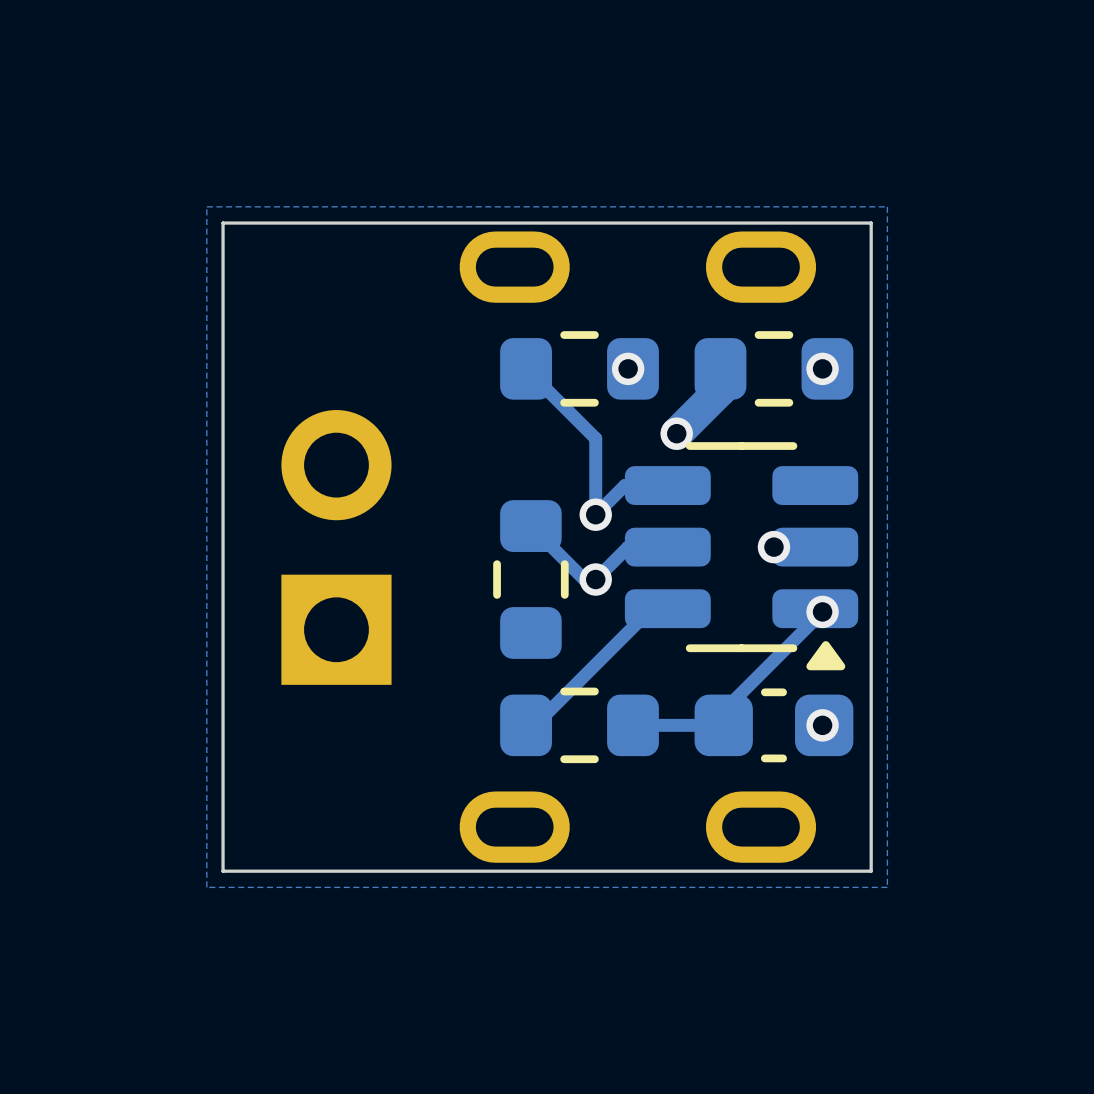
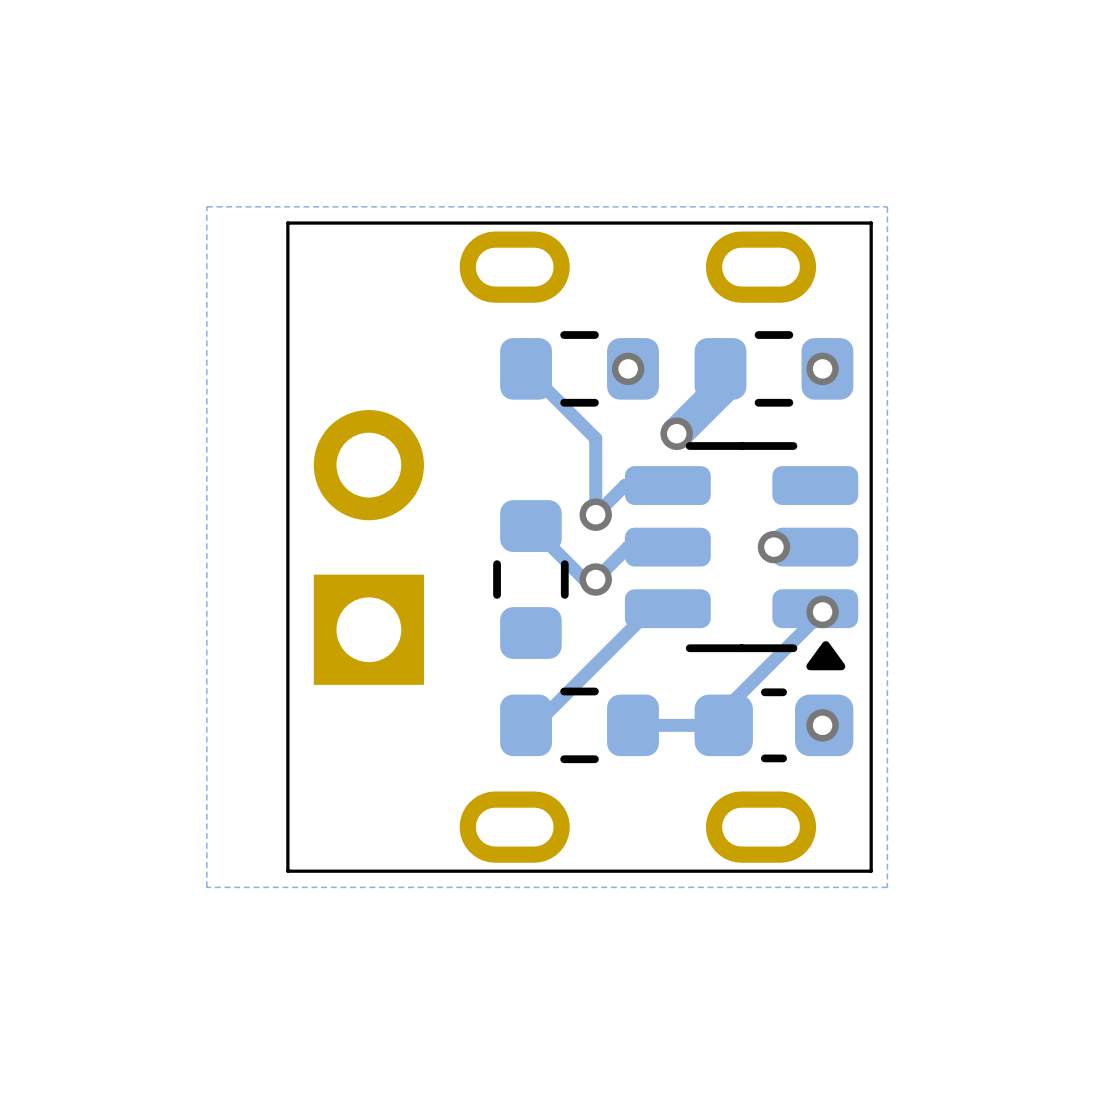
board edge: (287, 223) (223, 223) (223, 871) (287, 871) -> (287, 223) (287, 871)
part position: (336, 547) -> (368, 547)

